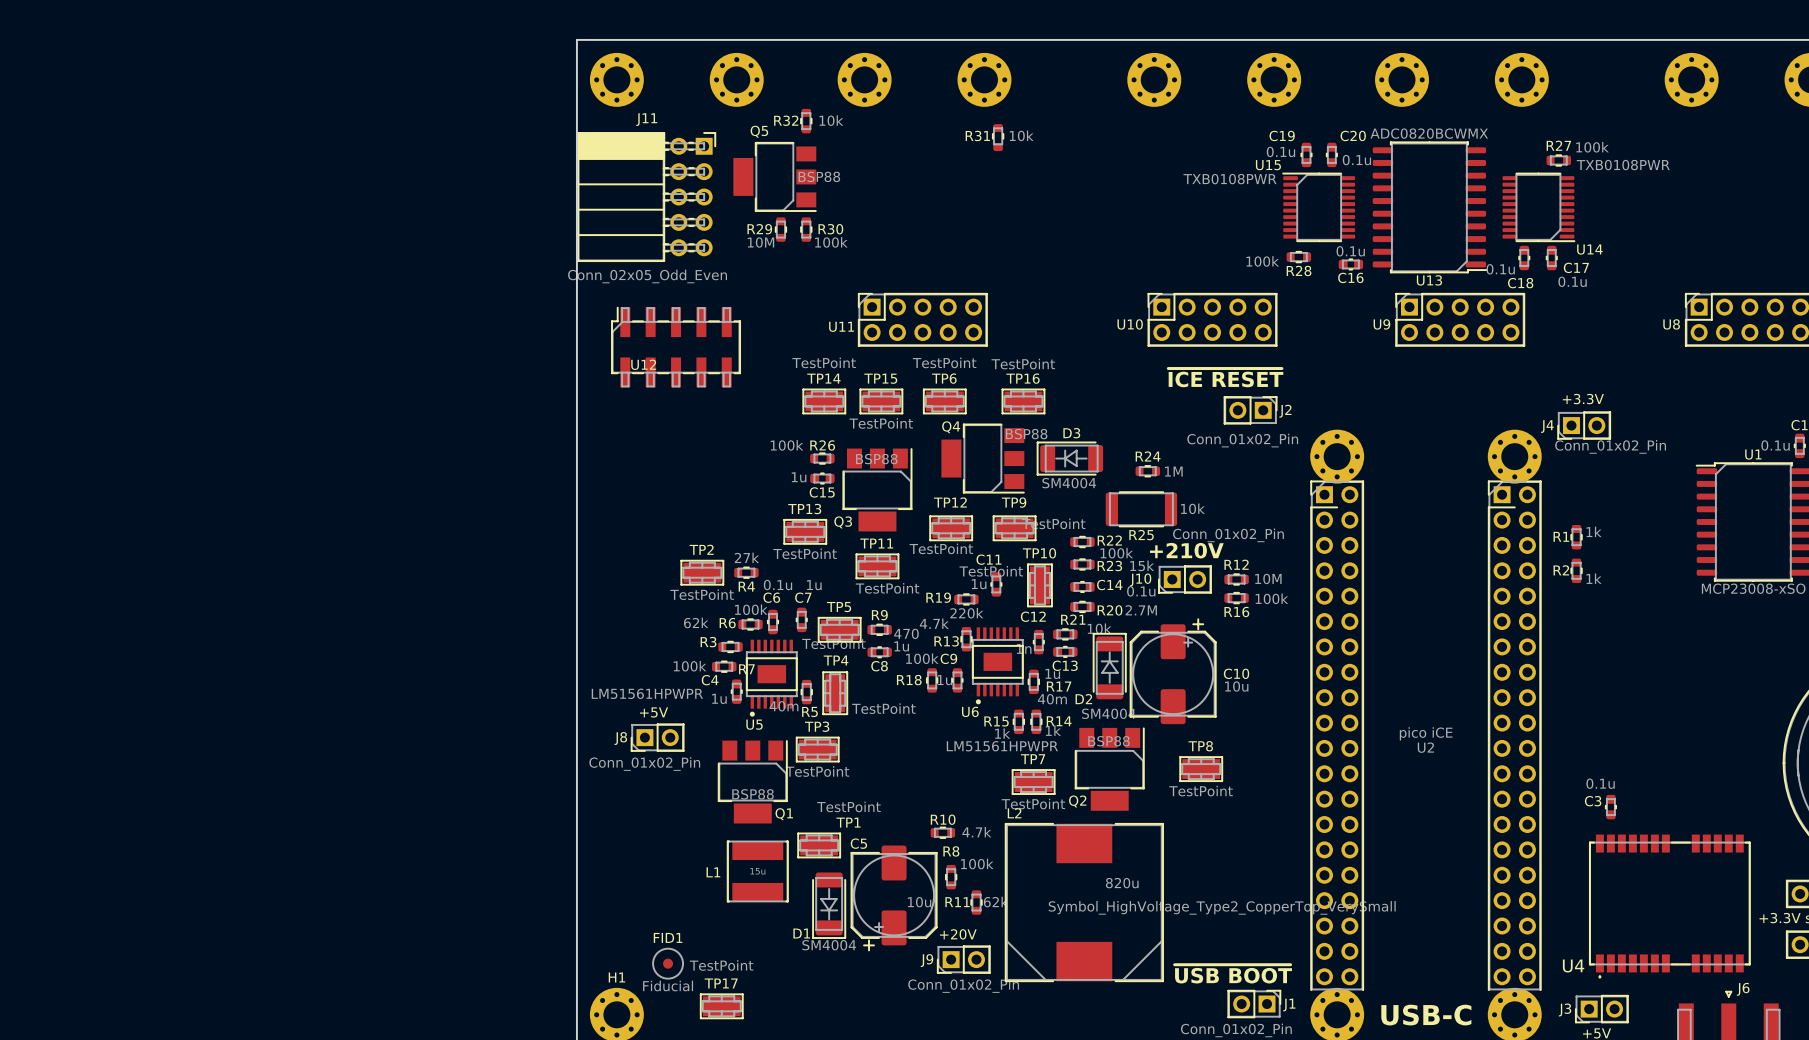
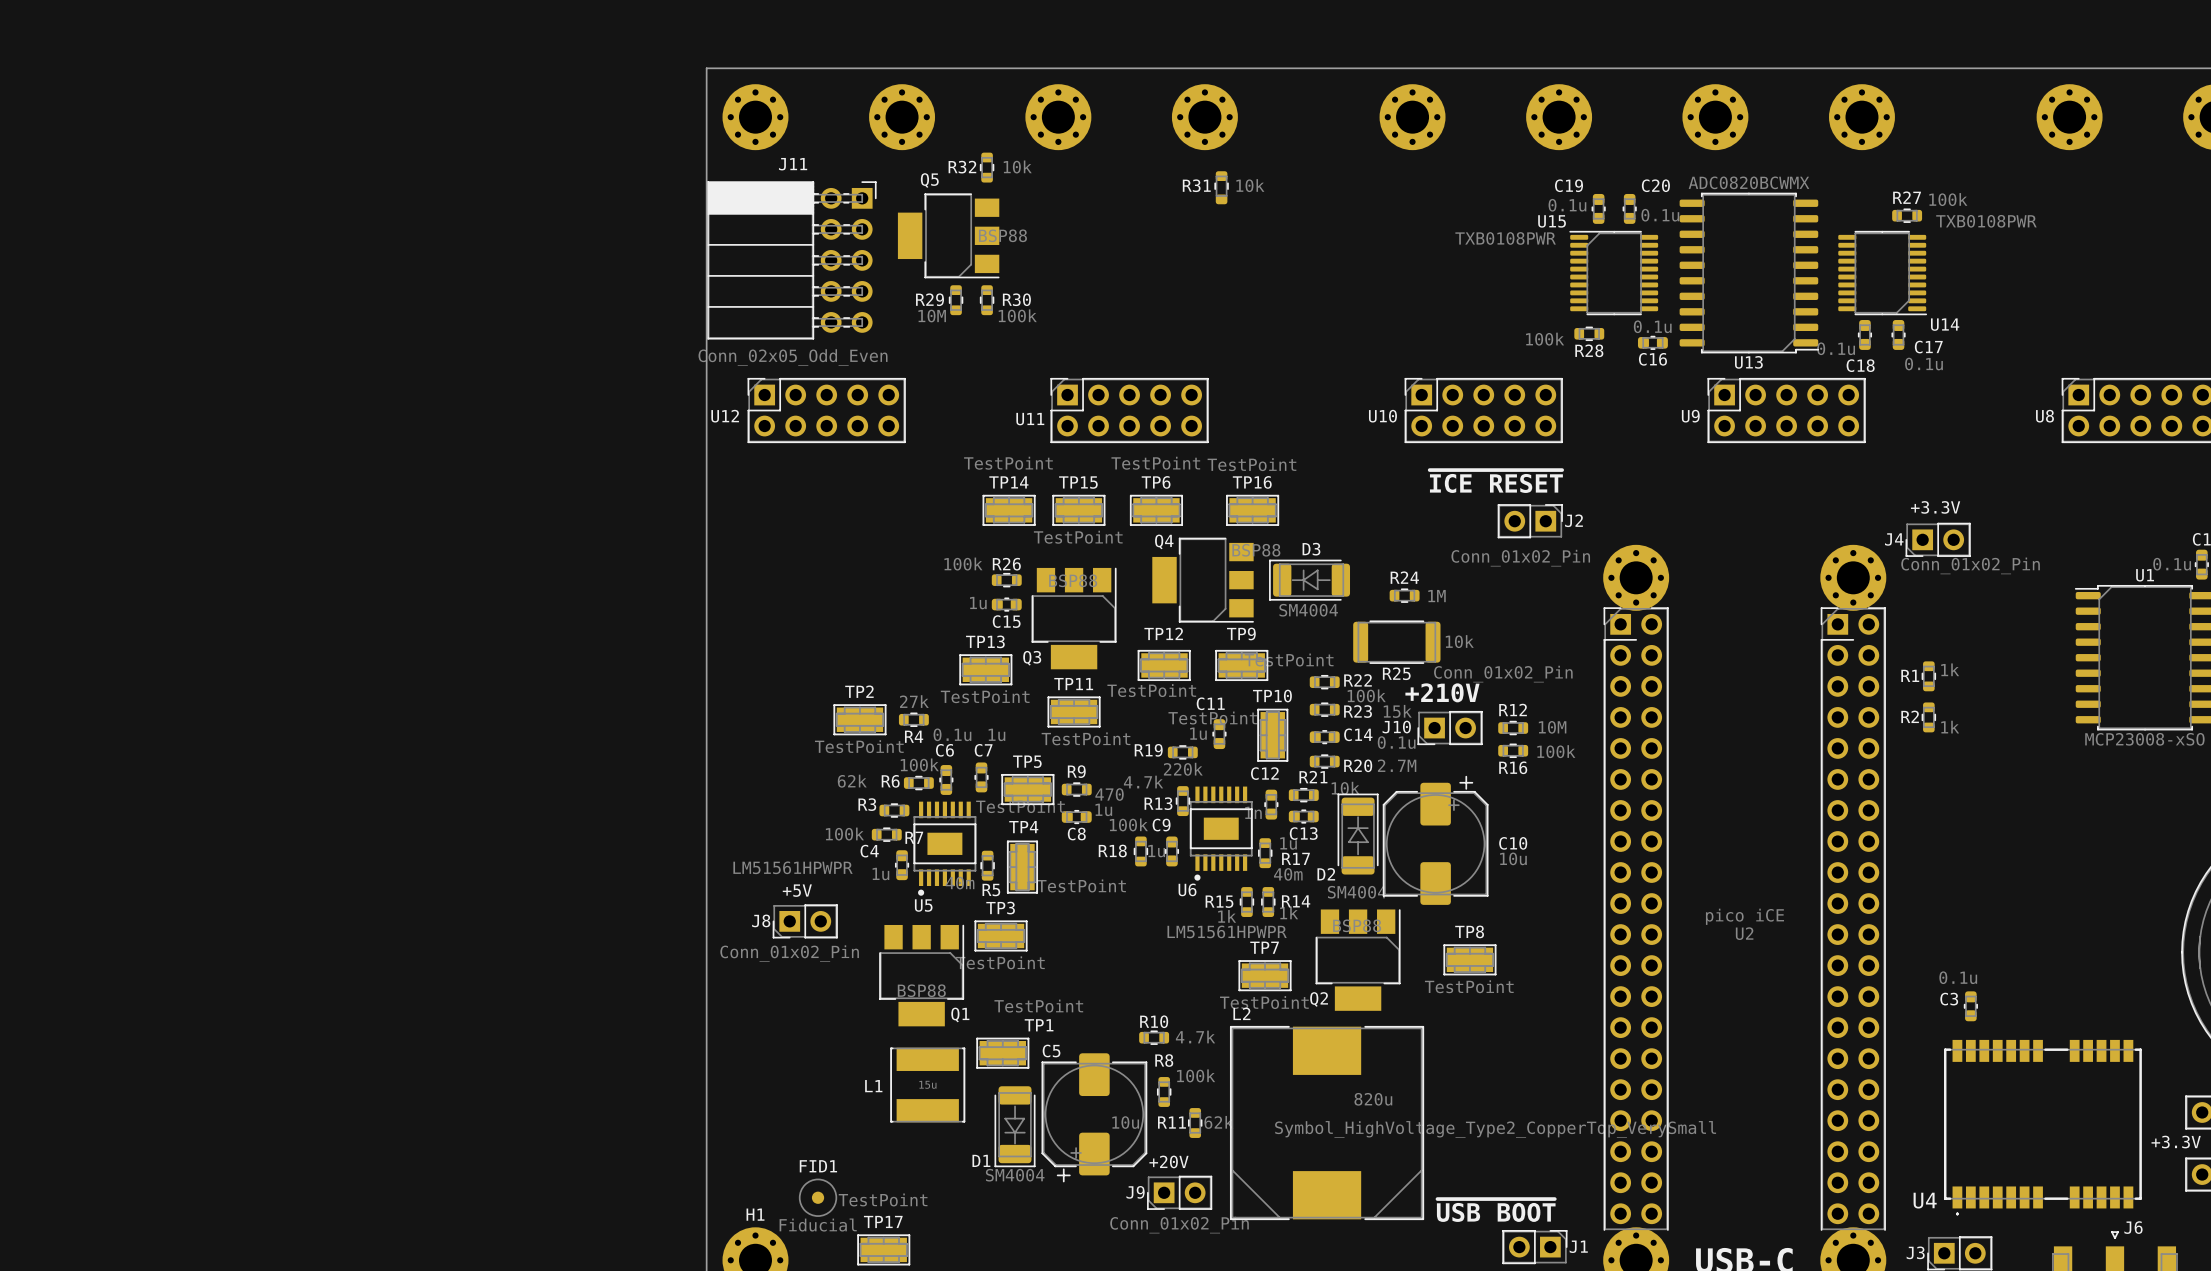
U12 footprint: [589, 52, 764, 388] -> [722, 84, 936, 444]
U12 name position: U12 (643, 364) -> U12 (725, 416)

